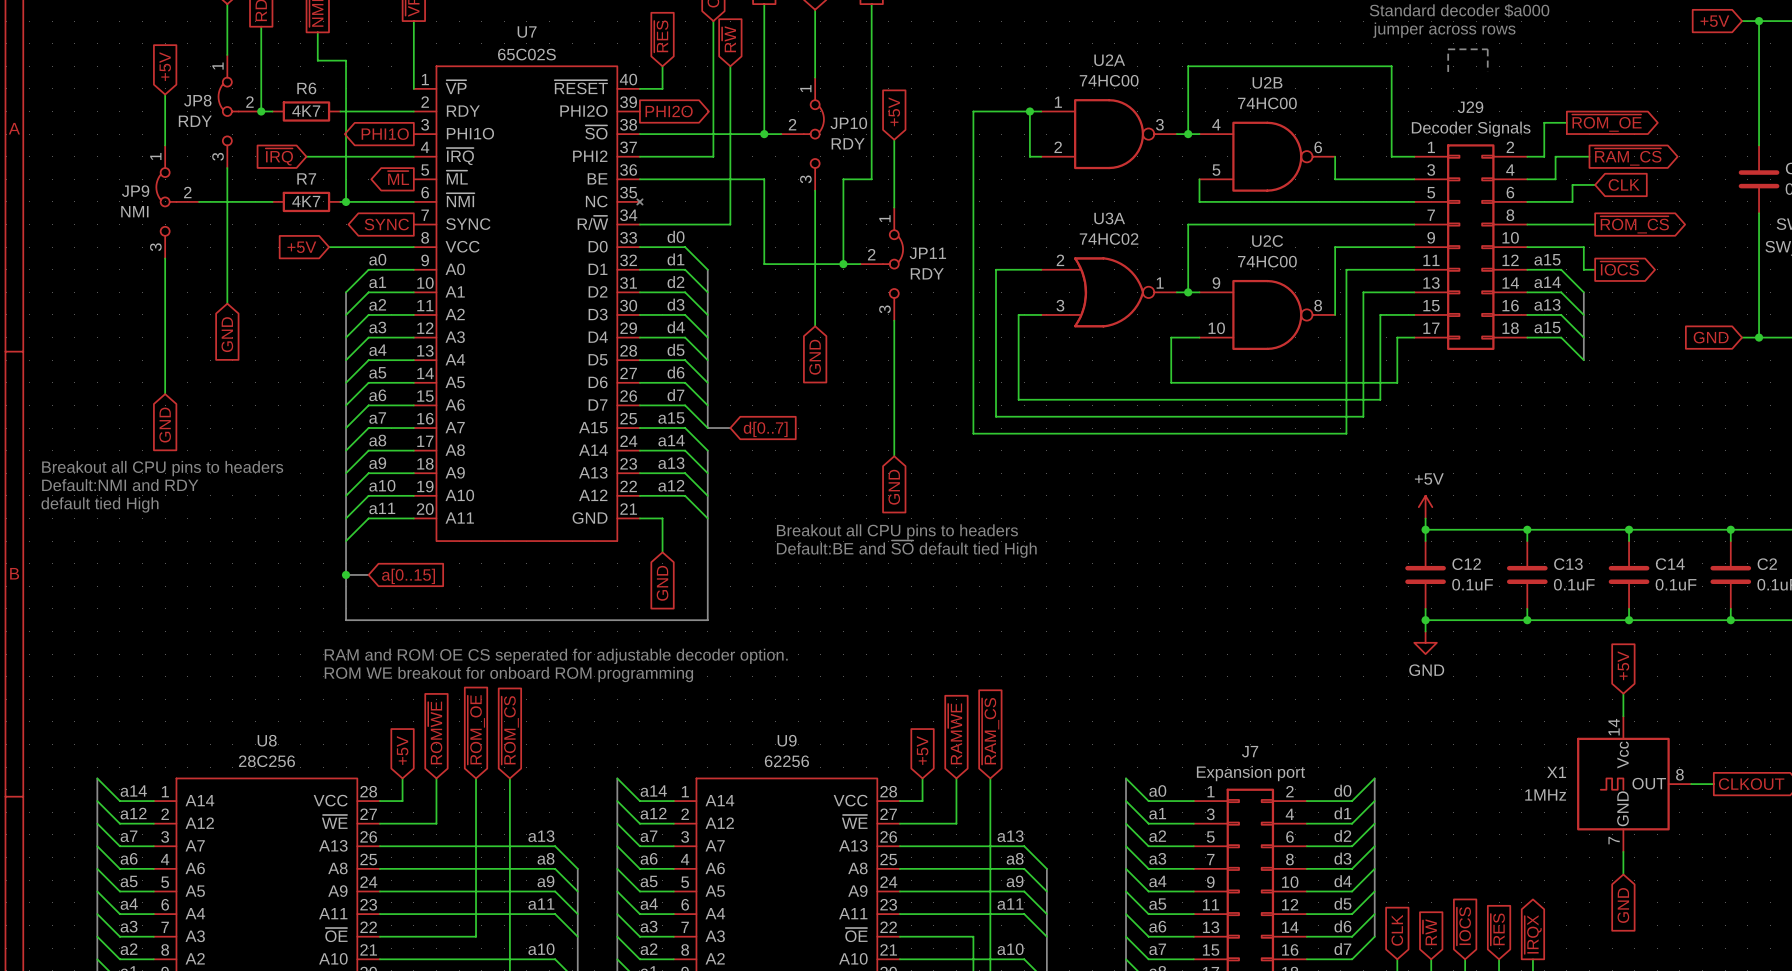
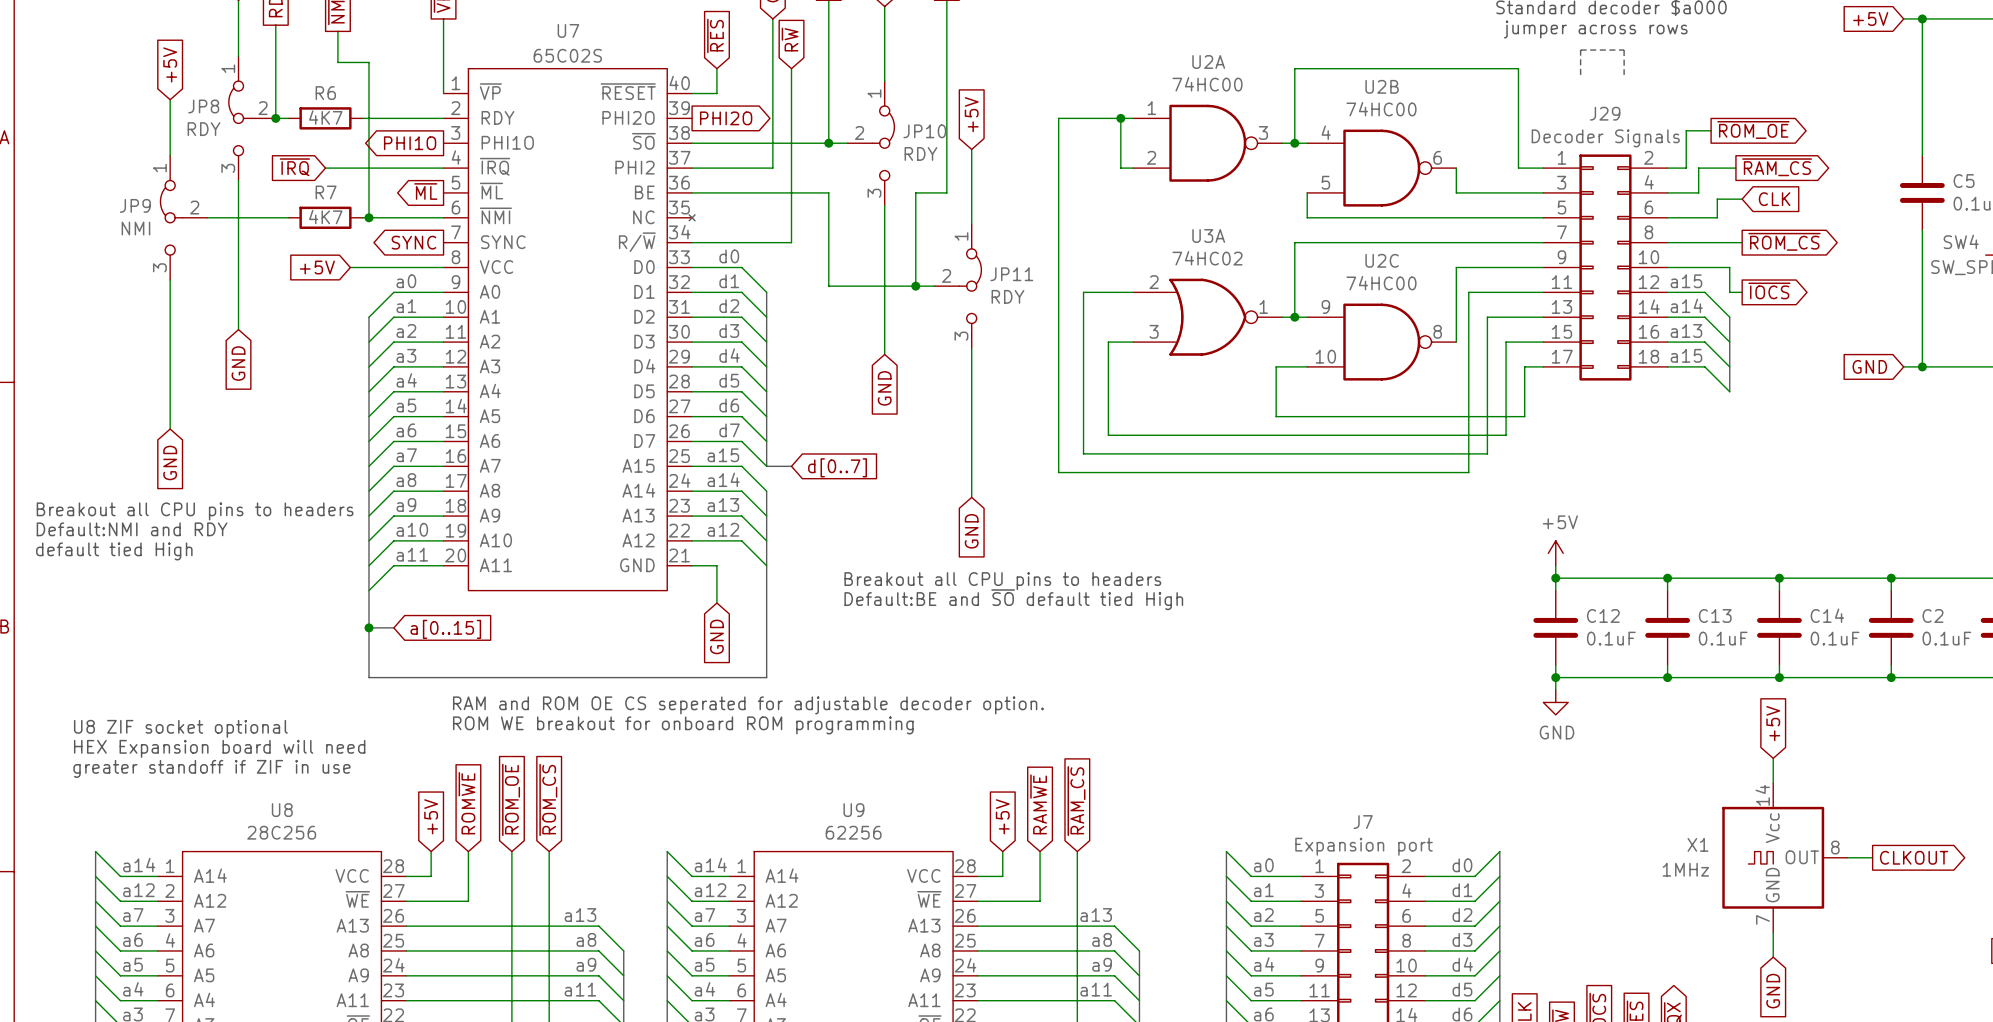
text position: RAM and ROM OE CS seperated for adjustable decoder option. (556, 656) -> RAM and ROM OE CS seperated for adjustable decoder option. (748, 705)
text: none -> U8 ZIF socket optional (180, 728)
text position: ROM WE breakout for onboard ROM programming (508, 674) -> ROM WE breakout for onboard ROM programming (683, 725)
text: none -> HEX Expansion board will need (219, 748)
text: none -> greater standoff if ZIF in use (211, 768)

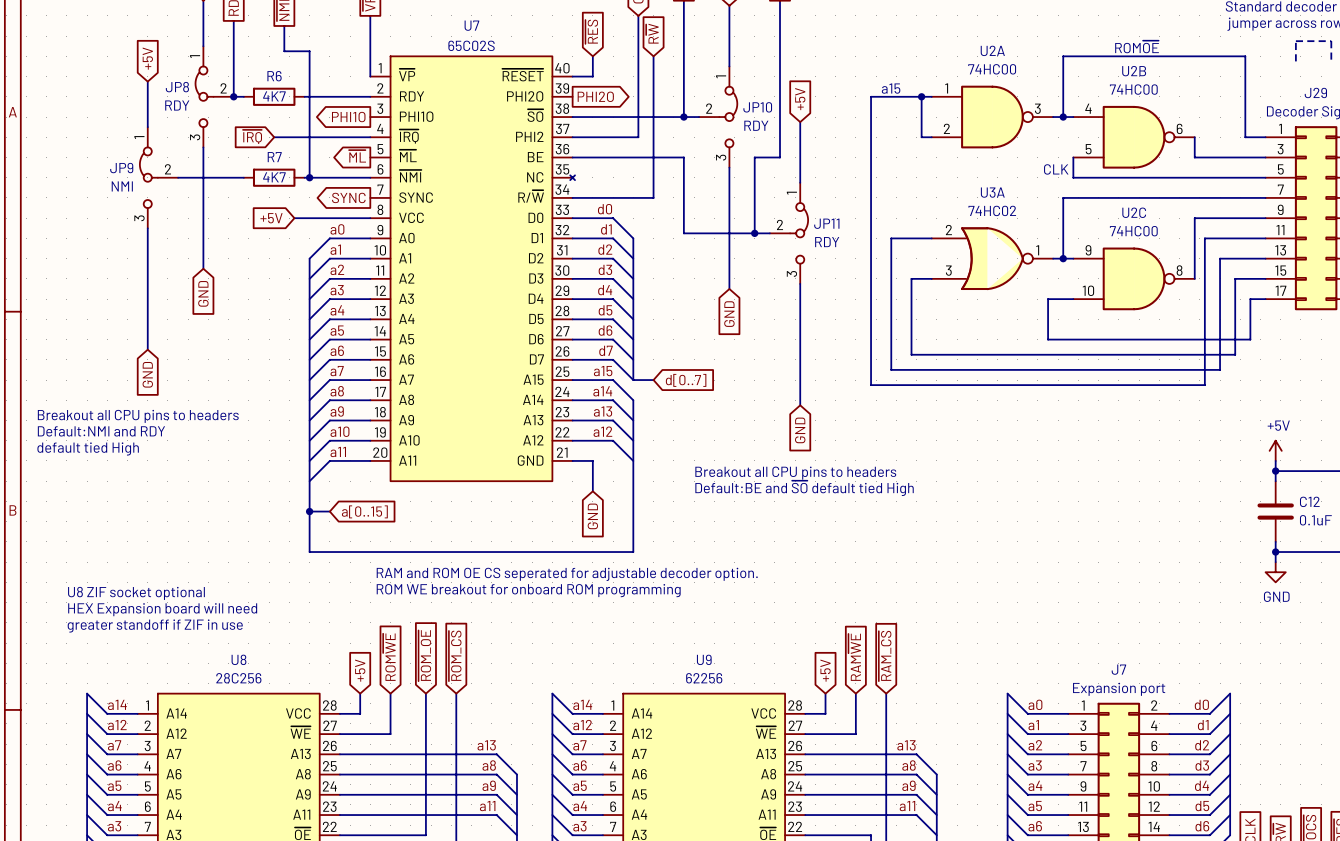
text: none -> ROM~{OE} (1137, 46)
text: none -> a15 (891, 88)
text: none -> CLK (1056, 169)

